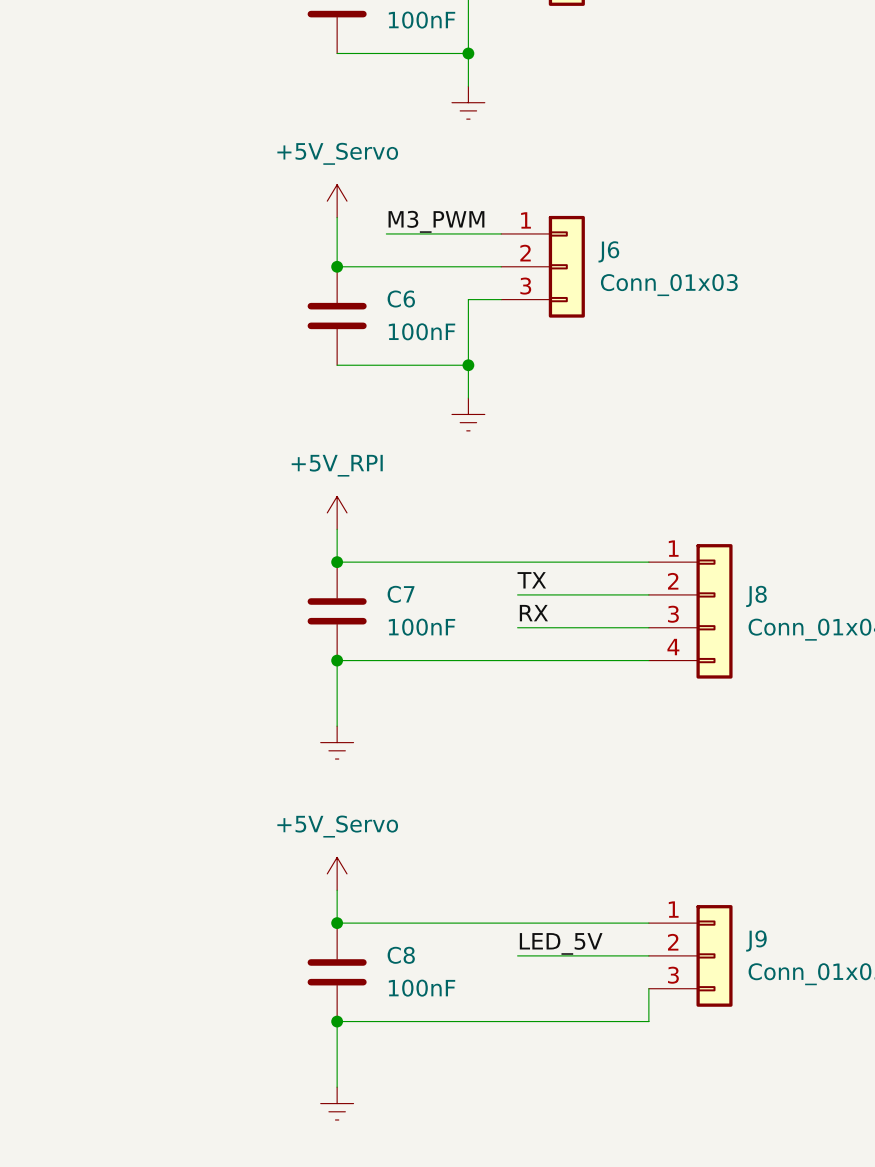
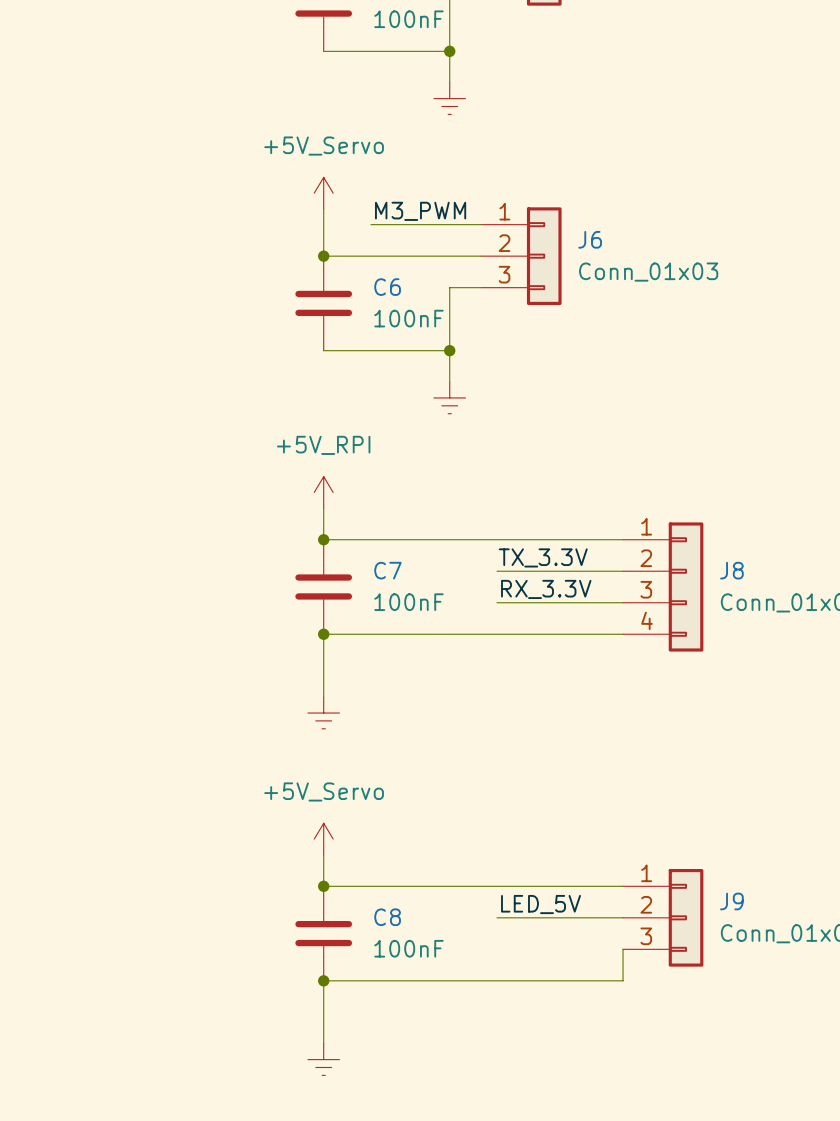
label: TX (531, 580) -> TX_3.3V (543, 557)
label: RX (533, 613) -> RX_3.3V (546, 589)

